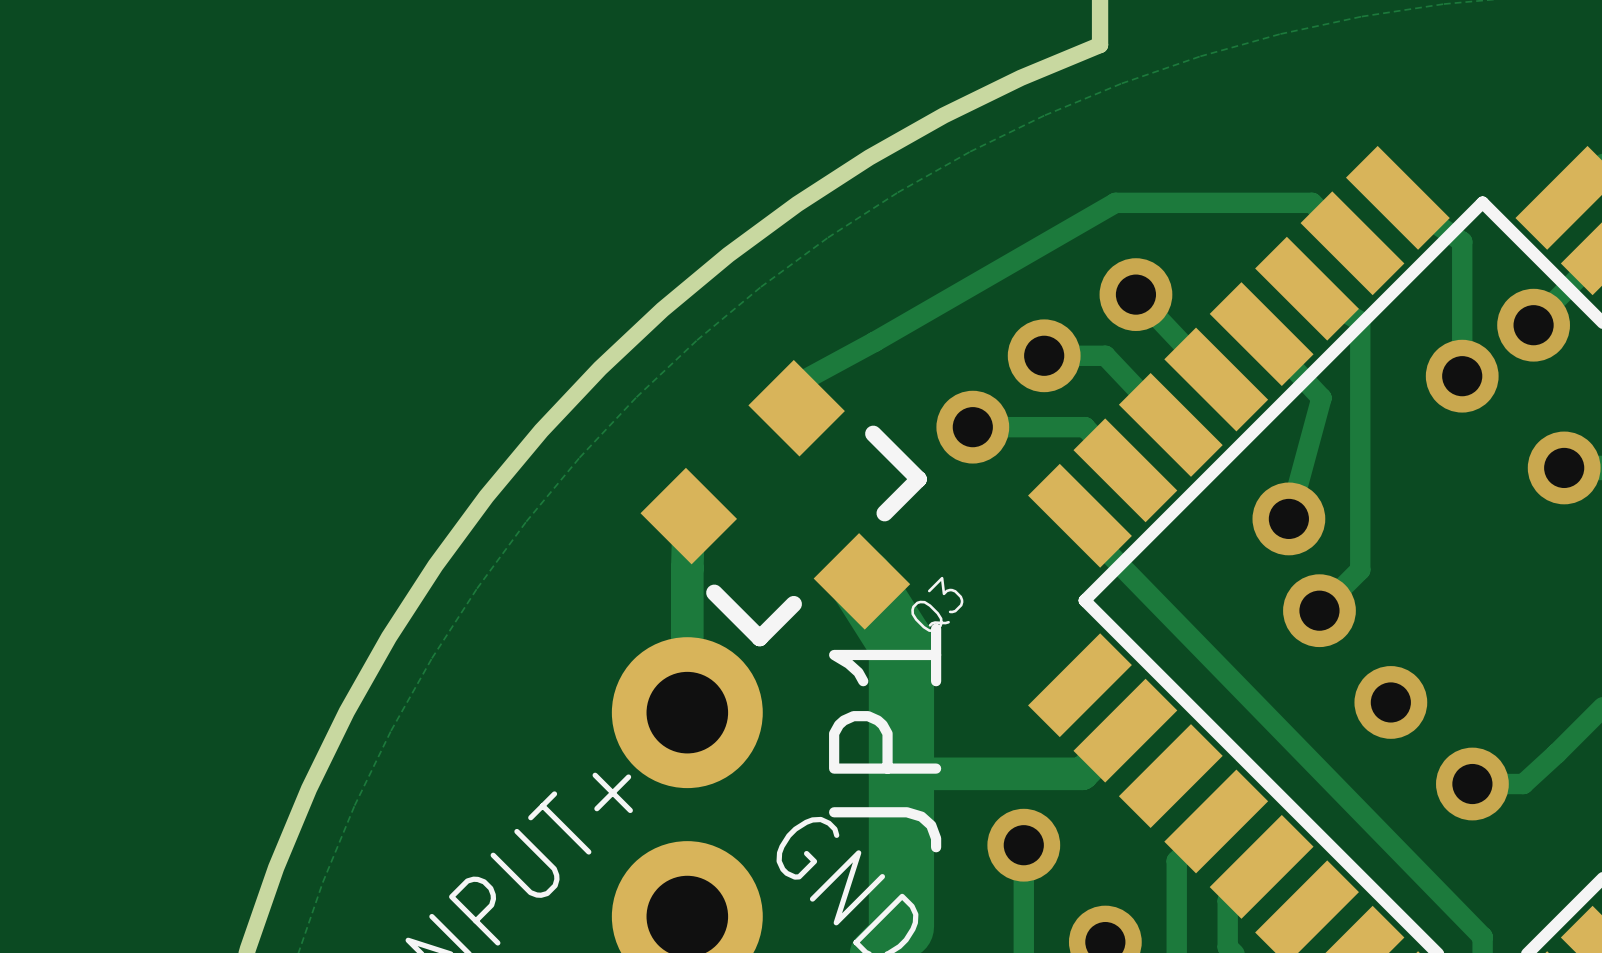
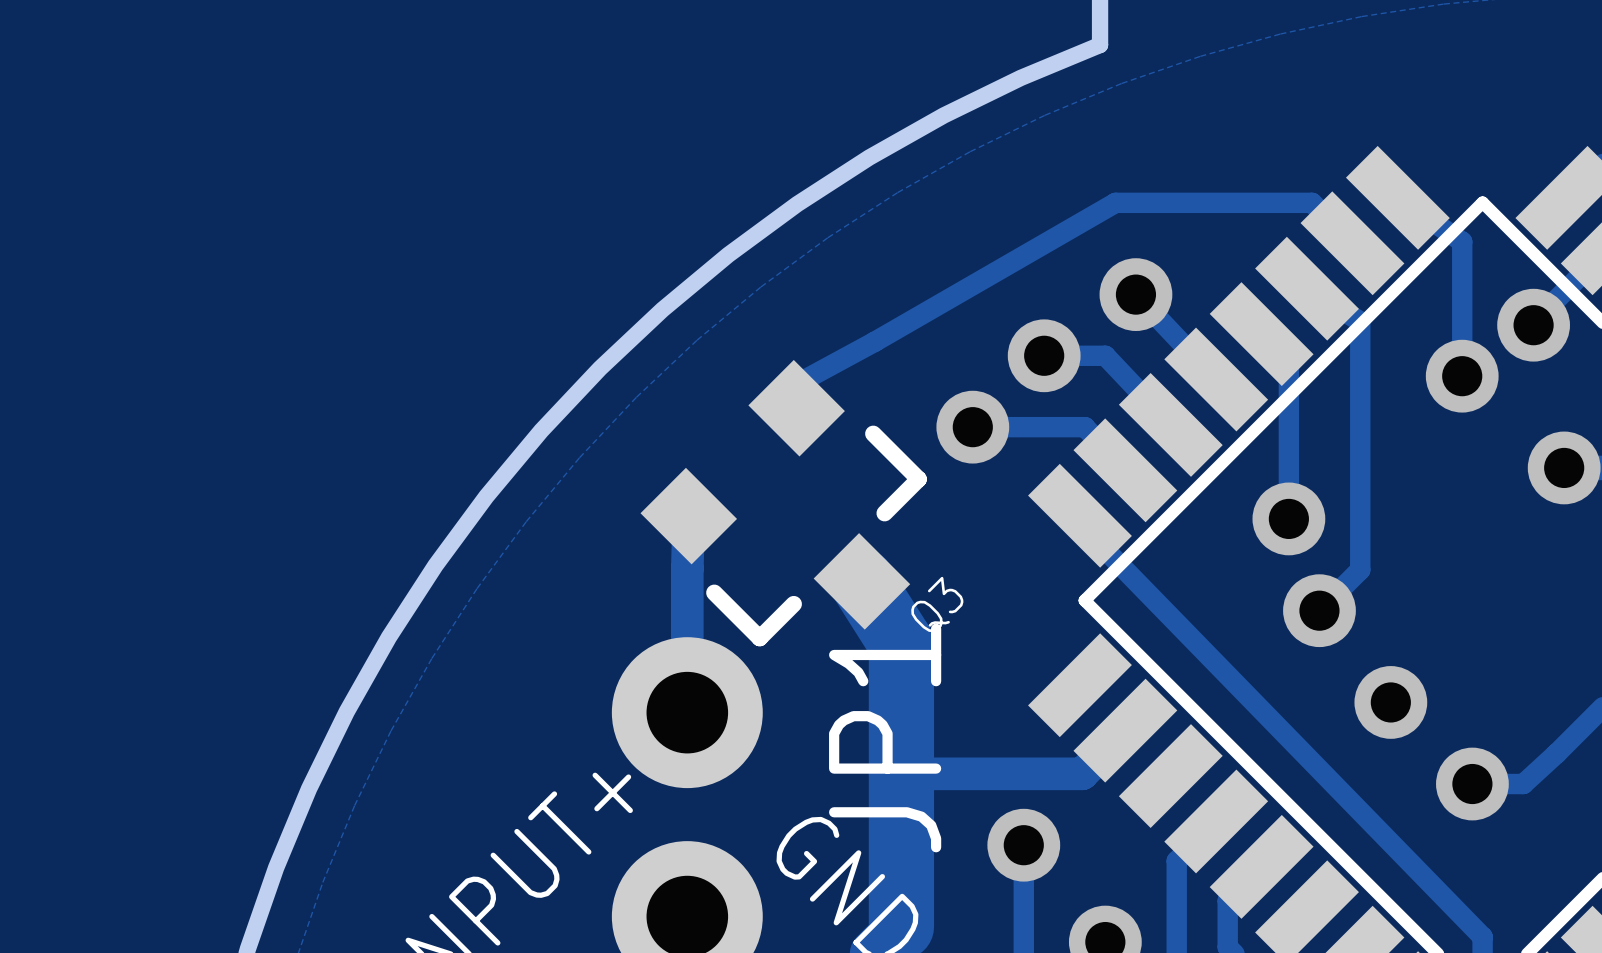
track: (1261, 334) (1321, 398) (1288, 518) -> (1261, 334) (1288, 361) (1288, 518)

